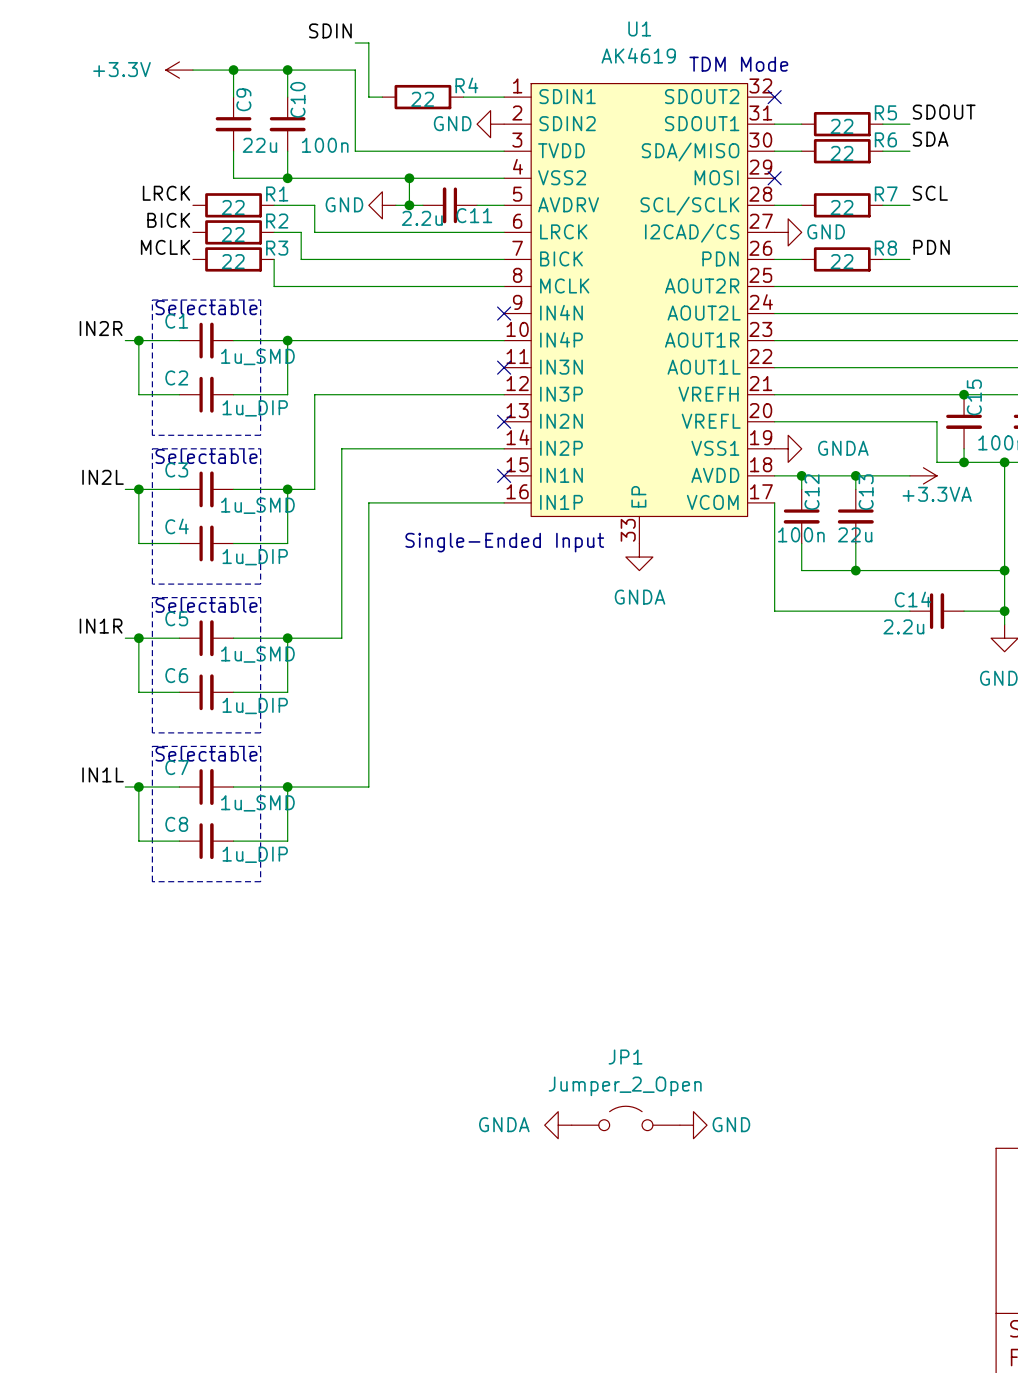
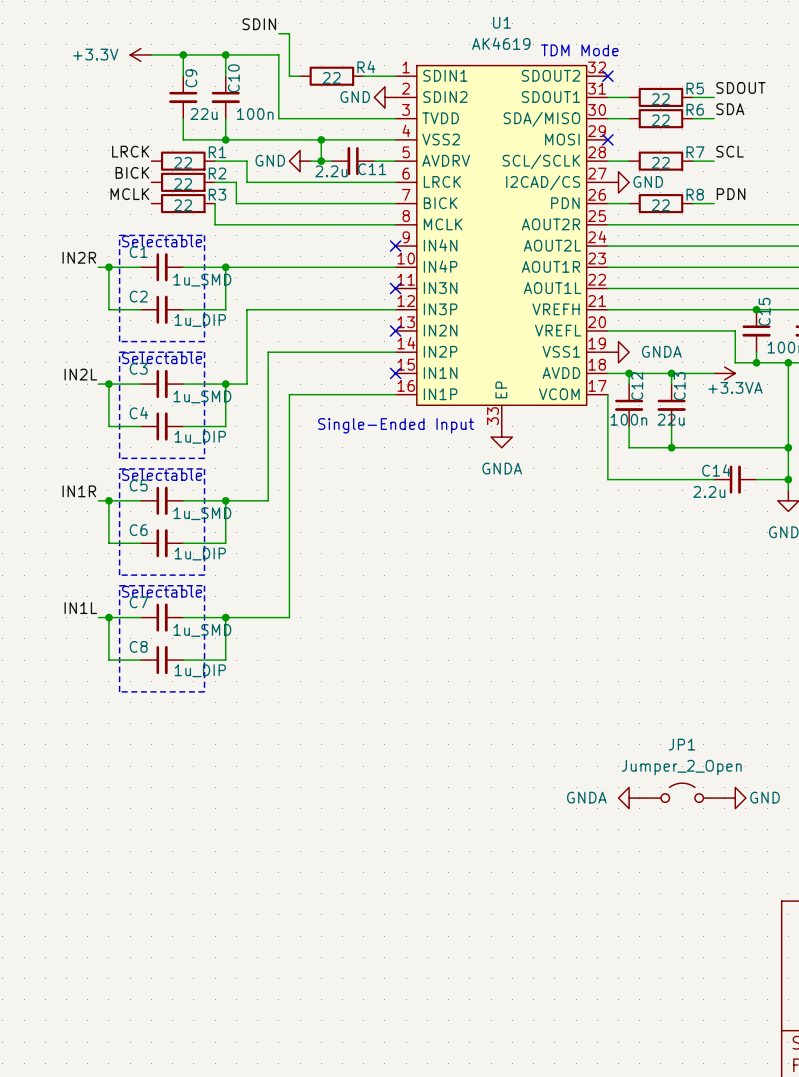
power symbol: none -> GNDA (629, 798)
power symbol: none -> GND (735, 798)
JP1 position: (625, 1118) -> (682, 792)
power symbol: GNDA (558, 1125) -> none
power symbol: GND (693, 1125) -> none

